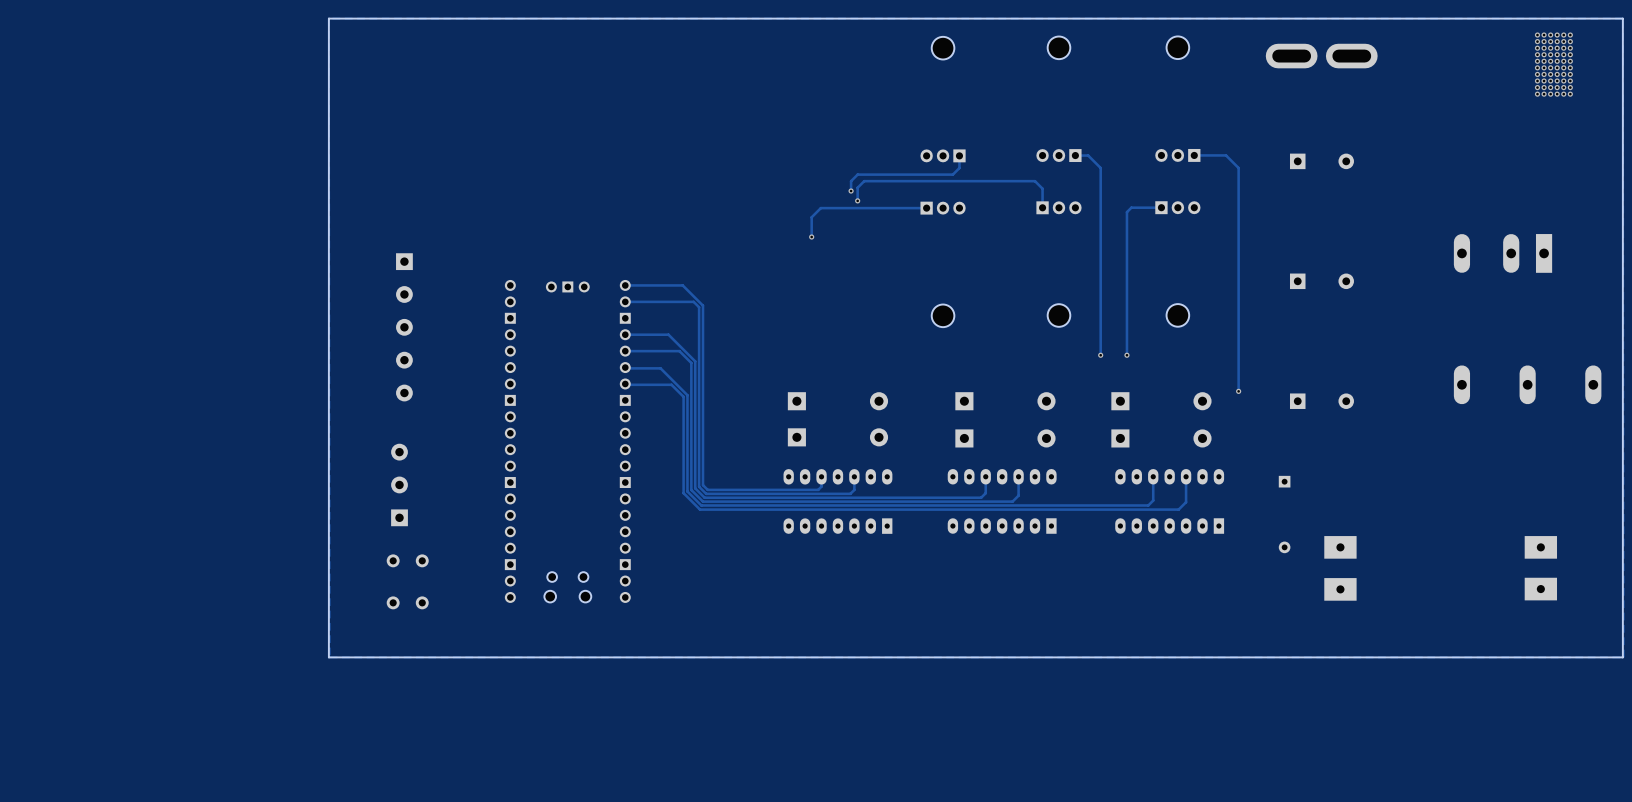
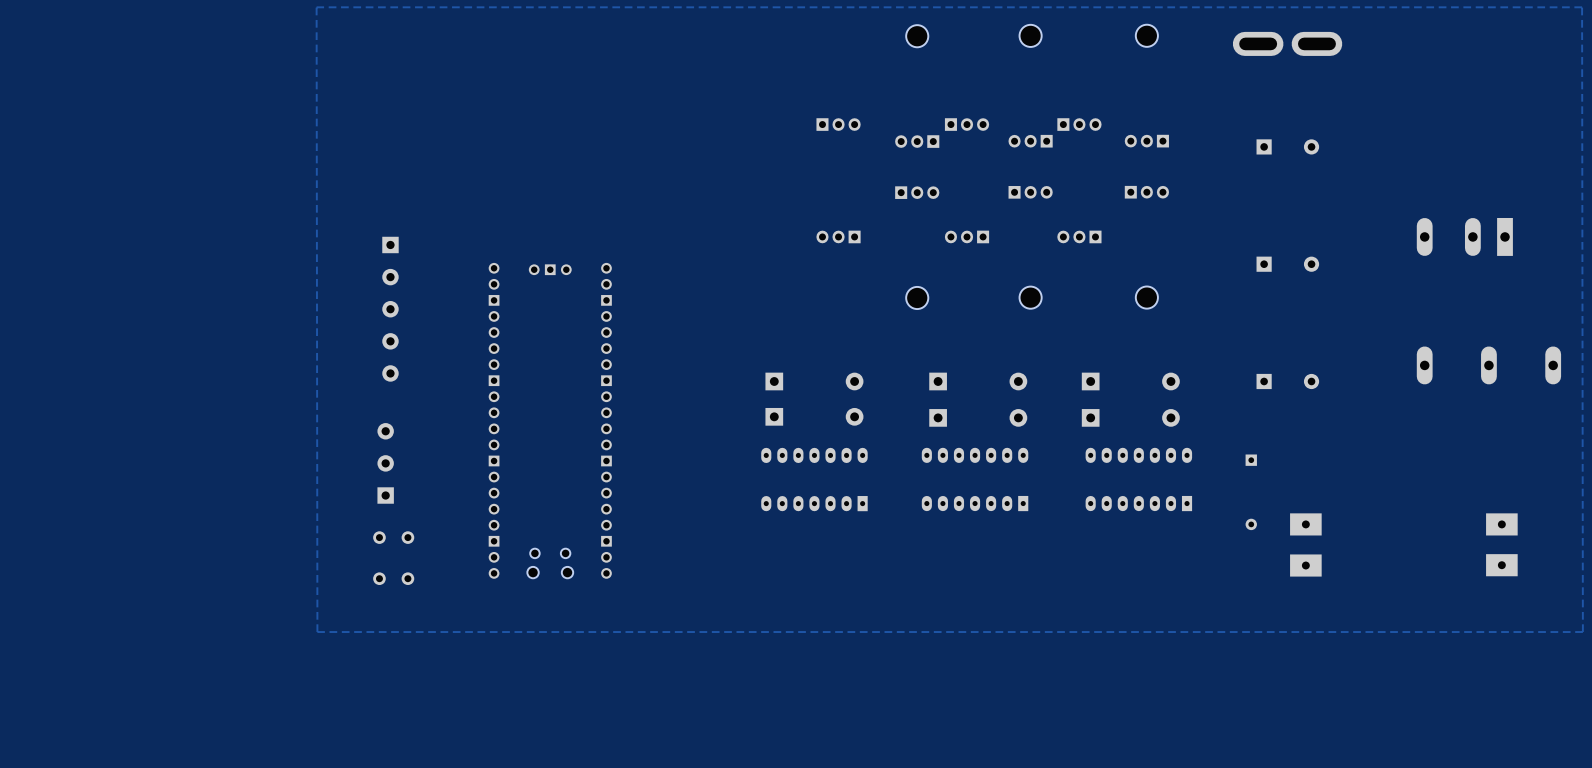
board edge: (1622, 18) (328, 18) (328, 657) (1622, 657) (1622, 18) -> none
via: (1537, 35) -> none
via: (1544, 35) -> none
via: (1550, 35) -> none
via: (1557, 35) -> none
via: (1563, 35) -> none
via: (1570, 35) -> none
via: (1537, 41) -> none
via: (1544, 41) -> none
via: (1550, 41) -> none
via: (1557, 41) -> none
via: (1563, 41) -> none
via: (1570, 41) -> none
via: (1537, 48) -> none
via: (1544, 48) -> none
via: (1550, 48) -> none
via: (1557, 48) -> none
via: (1563, 48) -> none
via: (1570, 48) -> none
via: (1537, 54) -> none
via: (1544, 54) -> none
via: (1550, 54) -> none
via: (1557, 54) -> none
via: (1563, 54) -> none
via: (1570, 54) -> none
via: (1537, 61) -> none
via: (1544, 61) -> none
via: (1550, 61) -> none
via: (1557, 61) -> none
via: (1563, 61) -> none
via: (1570, 61) -> none
via: (1537, 67) -> none
via: (1544, 67) -> none
via: (1550, 67) -> none
via: (1557, 67) -> none
via: (1563, 67) -> none
via: (1570, 67) -> none
via: (1537, 74) -> none
via: (1544, 74) -> none
via: (1550, 74) -> none
via: (1557, 74) -> none
via: (1563, 74) -> none
via: (1570, 74) -> none
via: (1537, 81) -> none
via: (1544, 81) -> none
via: (1550, 81) -> none
via: (1557, 81) -> none
via: (1563, 81) -> none
via: (1570, 81) -> none
via: (1537, 87) -> none
via: (1544, 87) -> none
via: (1550, 87) -> none
via: (1557, 87) -> none
via: (1563, 87) -> none
via: (1570, 87) -> none
via: (1537, 94) -> none
via: (1544, 94) -> none
via: (1550, 94) -> none
via: (1557, 94) -> none
via: (1563, 94) -> none
via: (1570, 94) -> none
part: none -> (838, 124)
part: none -> (967, 124)
part: none -> (1079, 124)
track: (959, 155) (959, 168) (952, 174) (857, 174) (851, 181) (851, 191) -> none
track: (1075, 155) (1088, 155) (1100, 168) (1100, 355) -> none
track: (1194, 155) (1226, 155) (1238, 168) (1238, 391) -> none
via: (851, 191) -> none
track: (857, 200) (857, 187) (864, 181) (1035, 181) (1042, 188) (1042, 207) -> none
via: (857, 200) -> none
track: (1161, 207) (1131, 207) (1126, 212) (1126, 355) -> none
track: (926, 208) (820, 208) (811, 217) (811, 237) -> none
via: (811, 237) -> none
part: none -> (838, 236)
part: none -> (967, 236)
part: none -> (1079, 236)
track: (625, 285) (682, 285) (702, 305) (702, 485) (707, 489) (818, 489) (821, 486) (821, 476) -> none
track: (625, 301) (693, 301) (699, 307) (699, 486) (706, 493) (850, 493) (854, 489) (854, 476) -> none
track: (625, 334) (668, 334) (695, 361) (695, 488) (704, 497) (981, 497) (985, 493) (985, 476) -> none
track: (625, 351) (679, 351) (691, 363) (691, 489) (703, 501) (1012, 501) (1018, 495) (1018, 476) -> none
via: (1100, 355) -> none
via: (1126, 355) -> none
track: (625, 367) (660, 368) (687, 395) (687, 491) (701, 505) (1148, 505) (1153, 500) (1153, 476) -> none
track: (625, 383) (671, 384) (683, 396) (683, 493) (700, 509) (1178, 509) (1186, 502) (1186, 476) -> none
via: (1238, 391) -> none

